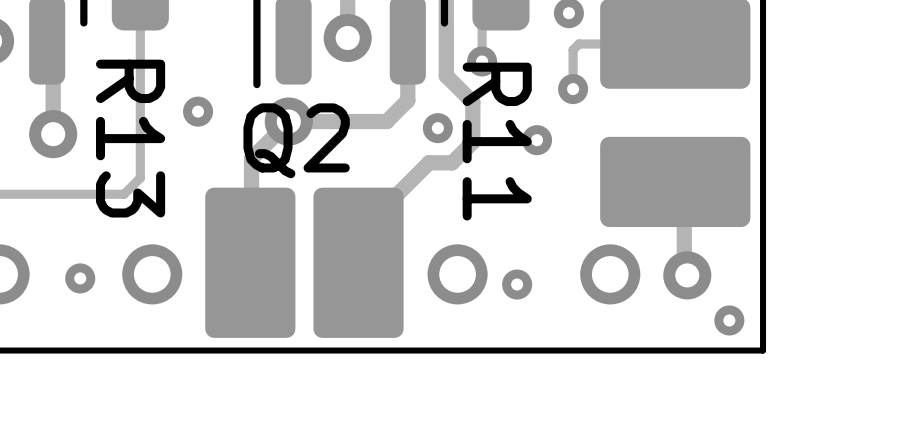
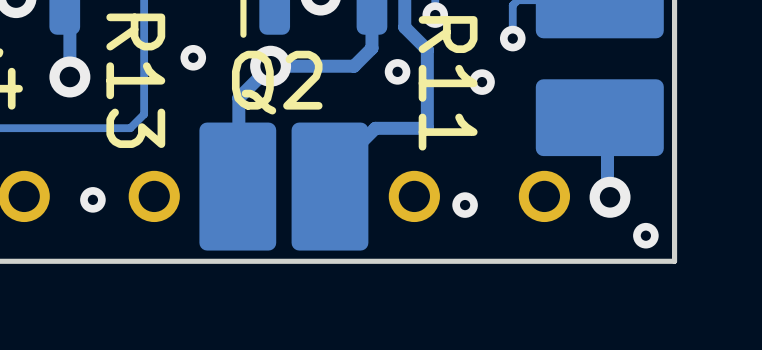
track: (472, 142) (452, 162) (429, 162) (359, 232) (359, 246) -> (427, 83) (427, 128) (375, 128) (331, 172)

